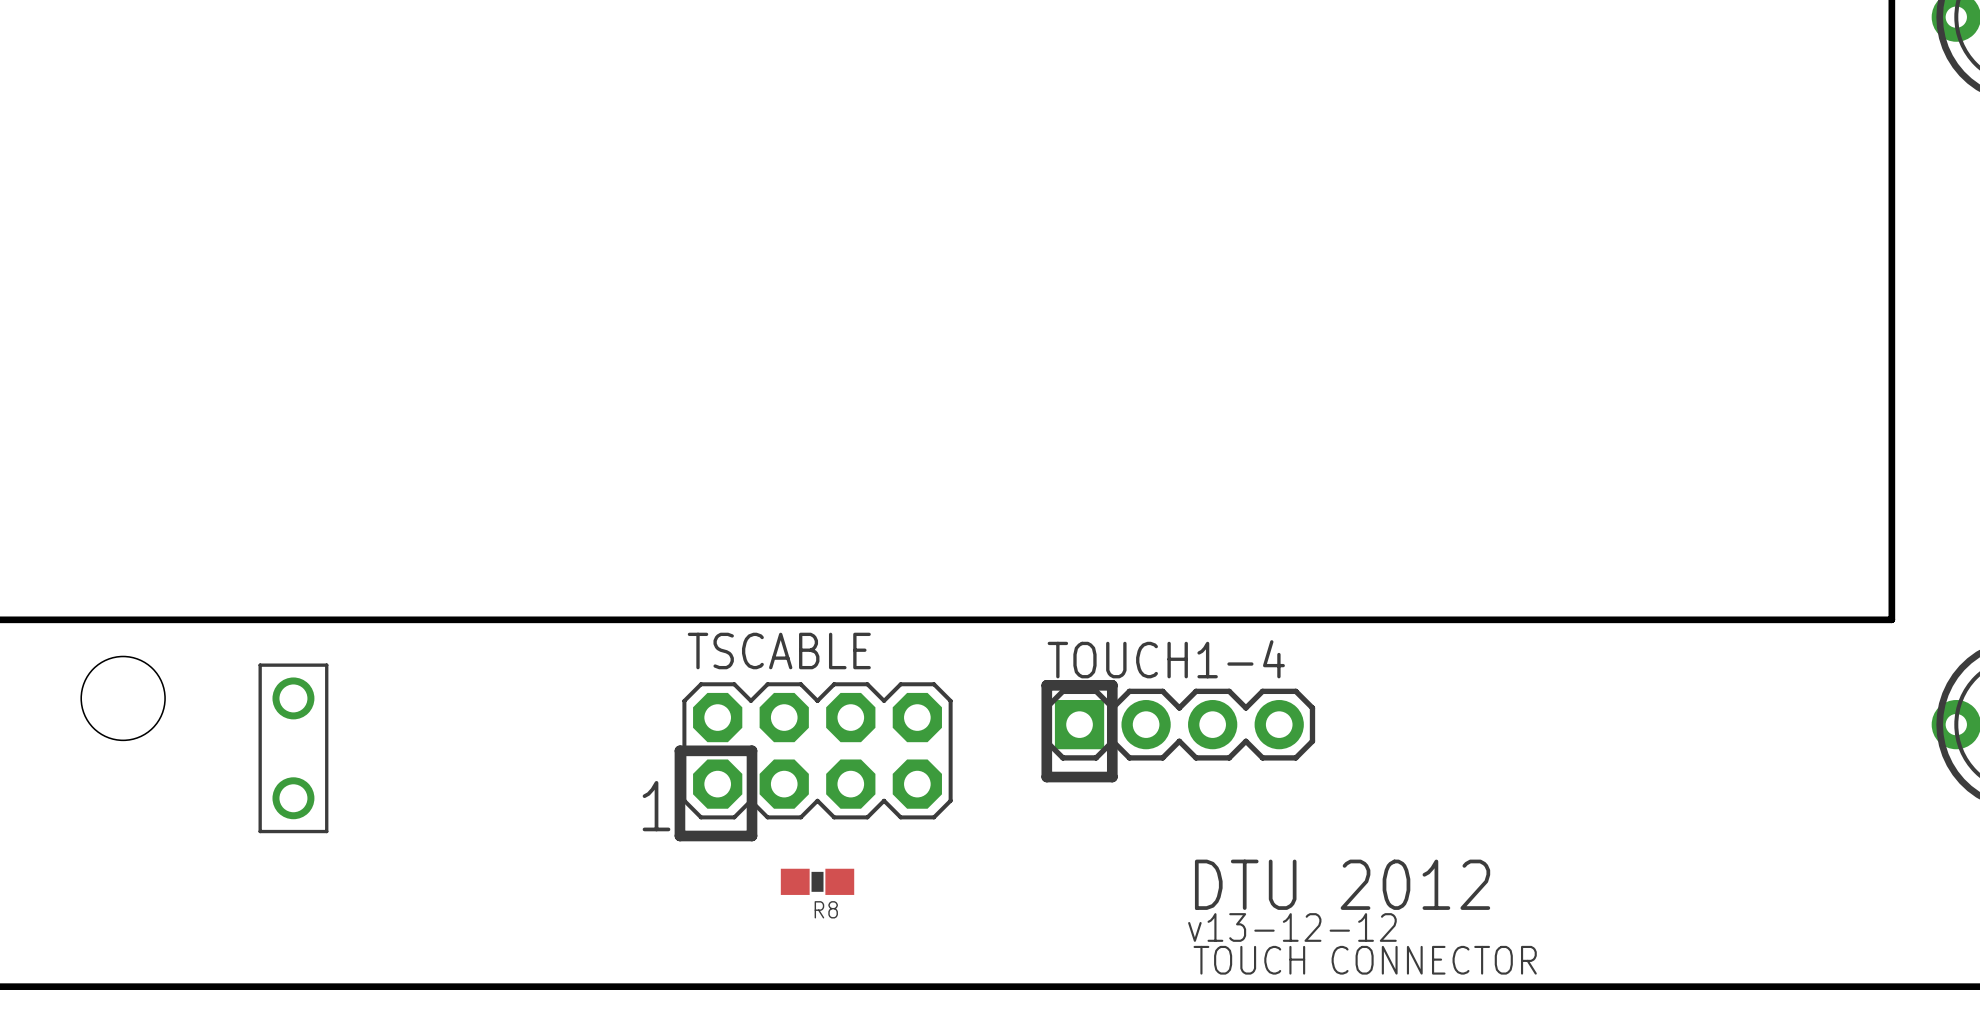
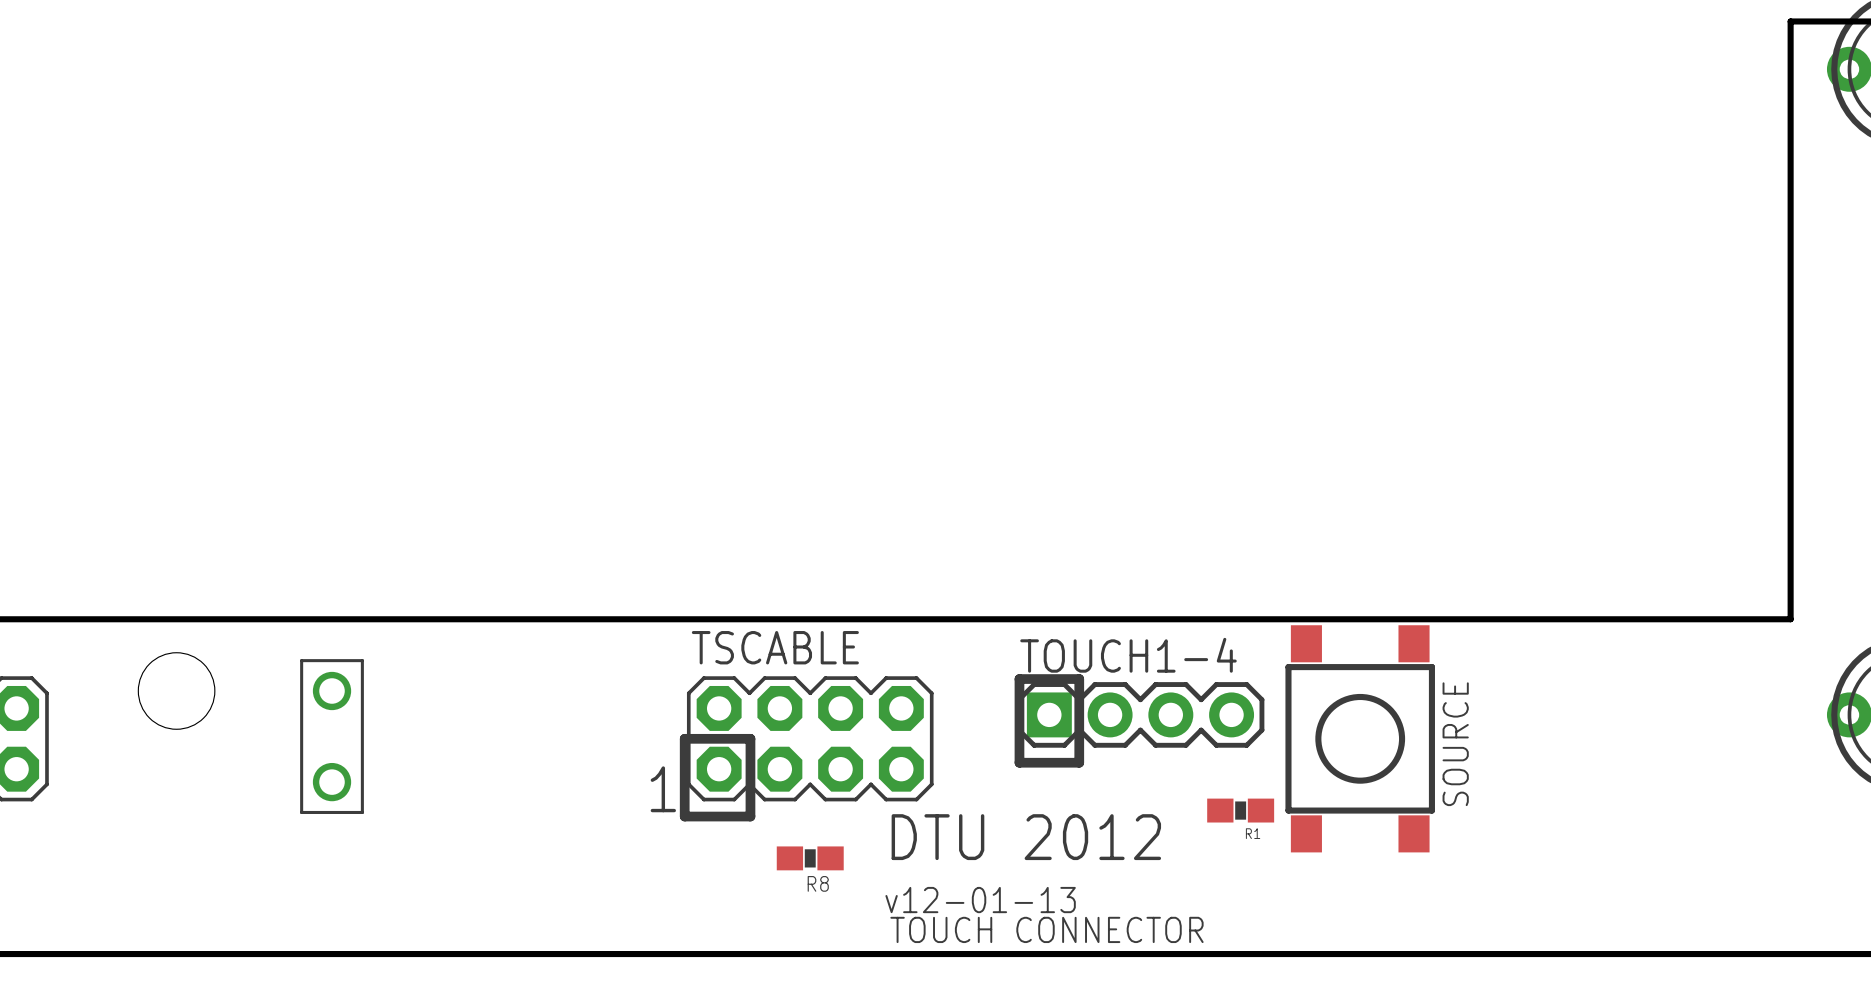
part: none -> (1360, 738)
text: none -> SOURCE (1455, 744)
R1: none -> (1240, 810)
text position: DTU 2012 (1342, 884) -> DTU 2012 (1026, 837)
text: none -> v12-01-13 (980, 900)
text: v13-12-12 (1292, 927) -> none
text position: TOUCH CONNECTOR (1365, 960) -> TOUCH CONNECTOR (1046, 929)

